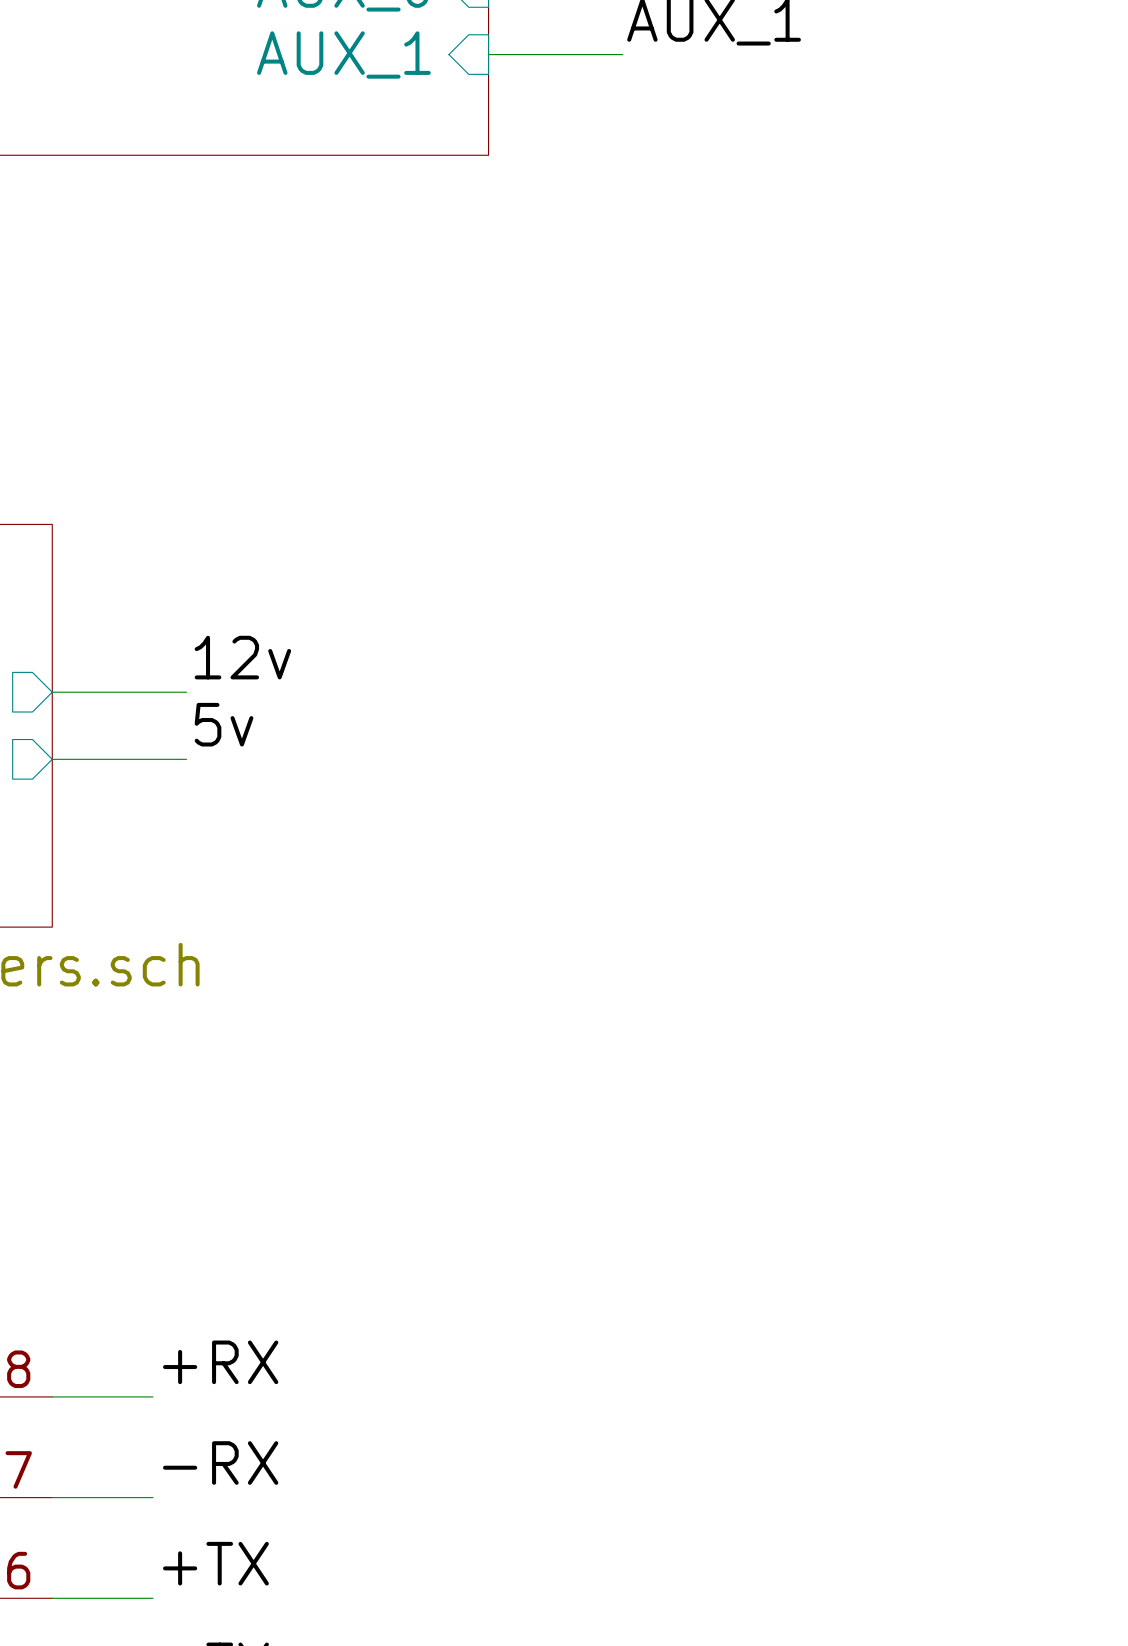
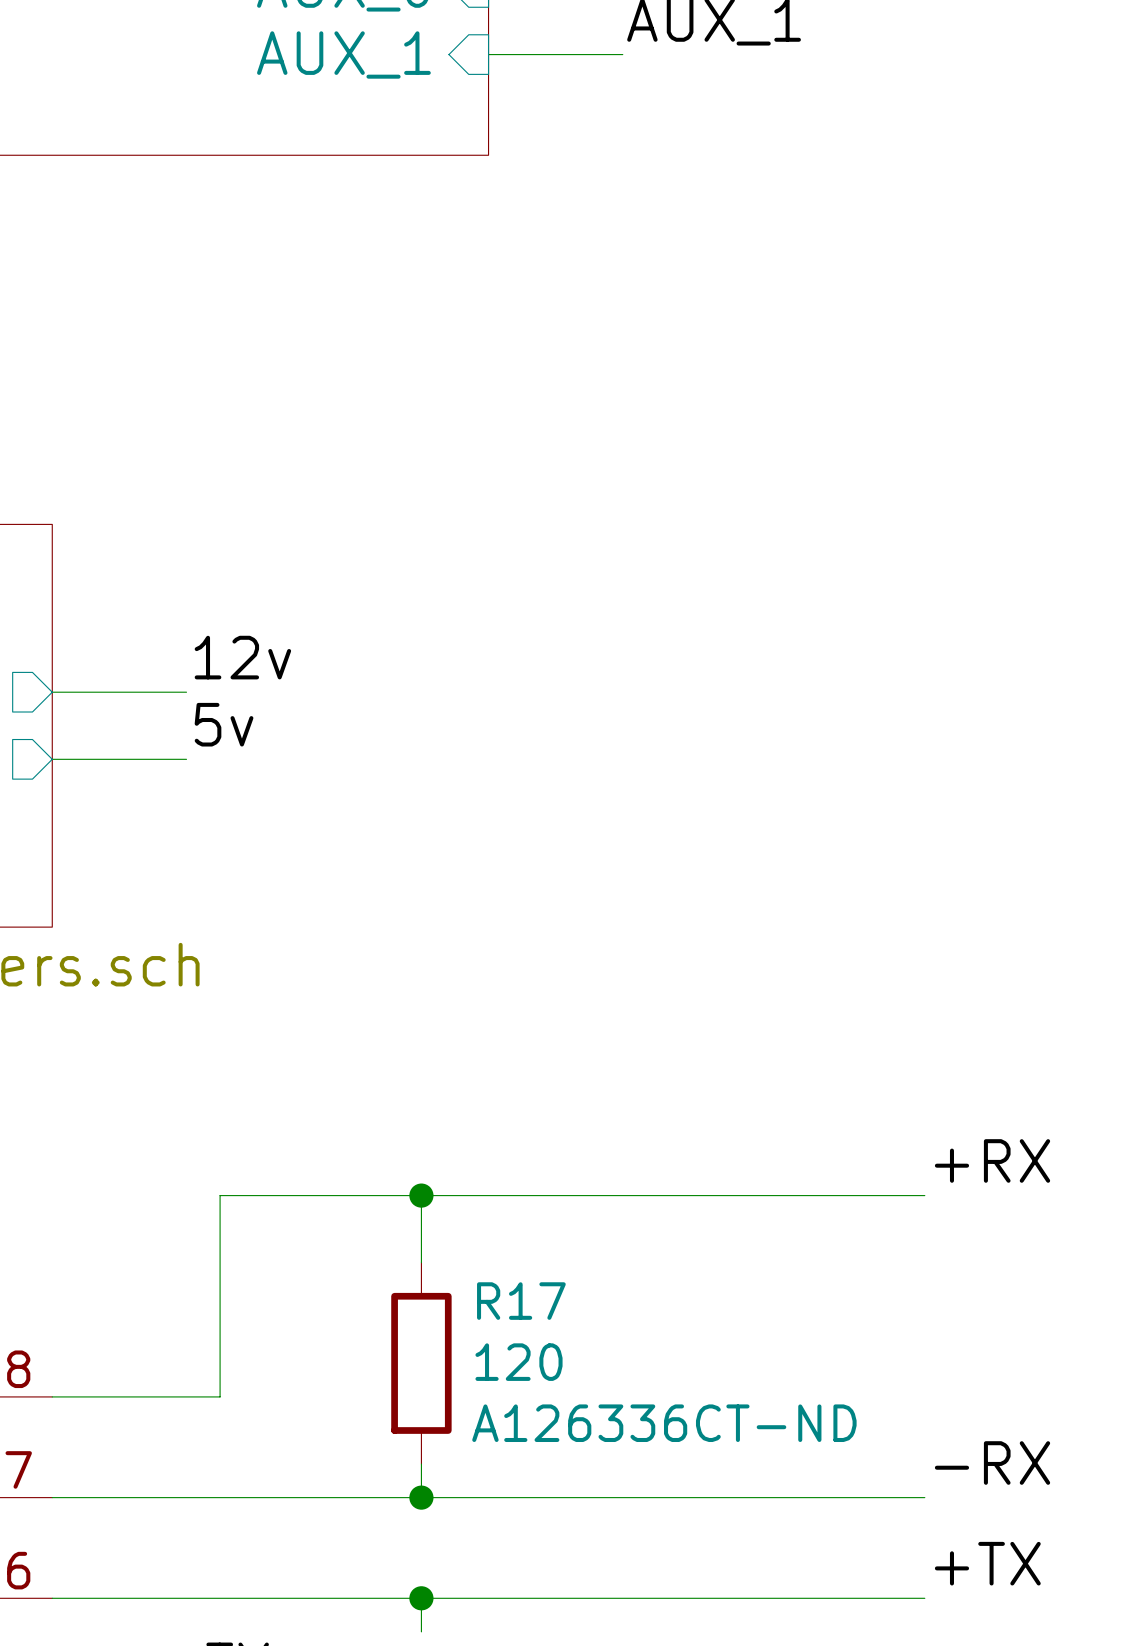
label: none -> +RX (992, 1160)
wire: none -> (421, 1195) (421, 1262)
junction: none -> (421, 1195)
wire: none -> (924, 1195) (220, 1195) (220, 1396) (152, 1396)
label: +RX (220, 1362) -> none
R17: none -> 120 (421, 1363)
label: -RX (220, 1463) -> none
label: none -> -RX (992, 1463)
wire: none -> (421, 1464) (421, 1497)
wire: none -> (152, 1497) (924, 1497)
junction: none -> (421, 1497)
label: +TX (215, 1563) -> none
label: none -> +TX (987, 1563)
wire: none -> (152, 1598) (924, 1598)
wire: none -> (421, 1598) (421, 1631)
junction: none -> (421, 1598)

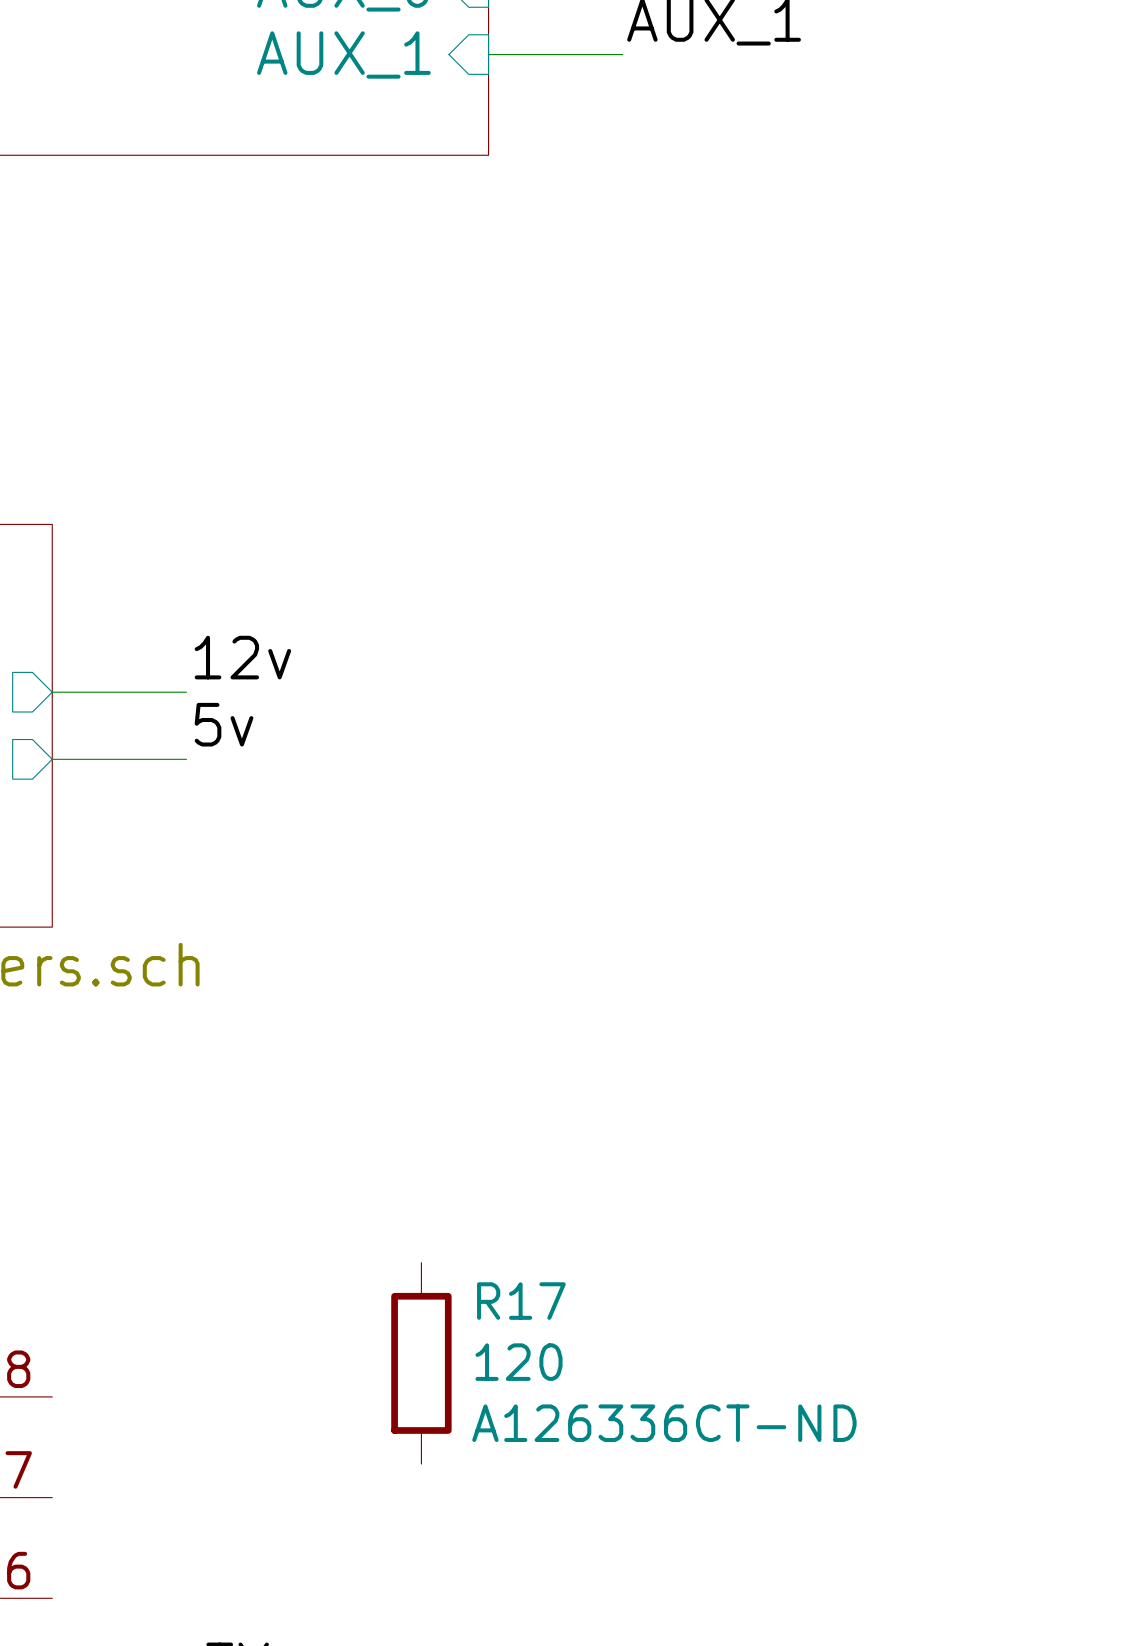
label: +RX (992, 1160) -> none
wire: (421, 1195) (421, 1262) -> none
junction: (421, 1195) -> none
wire: (924, 1195) (220, 1195) (220, 1396) (52, 1396) -> none
label: -RX (992, 1463) -> none
wire: (421, 1464) (421, 1497) -> none
wire: (52, 1497) (924, 1497) -> none
junction: (421, 1497) -> none
label: +TX (987, 1563) -> none
wire: (52, 1598) (924, 1598) -> none
wire: (421, 1598) (421, 1631) -> none
junction: (421, 1598) -> none

